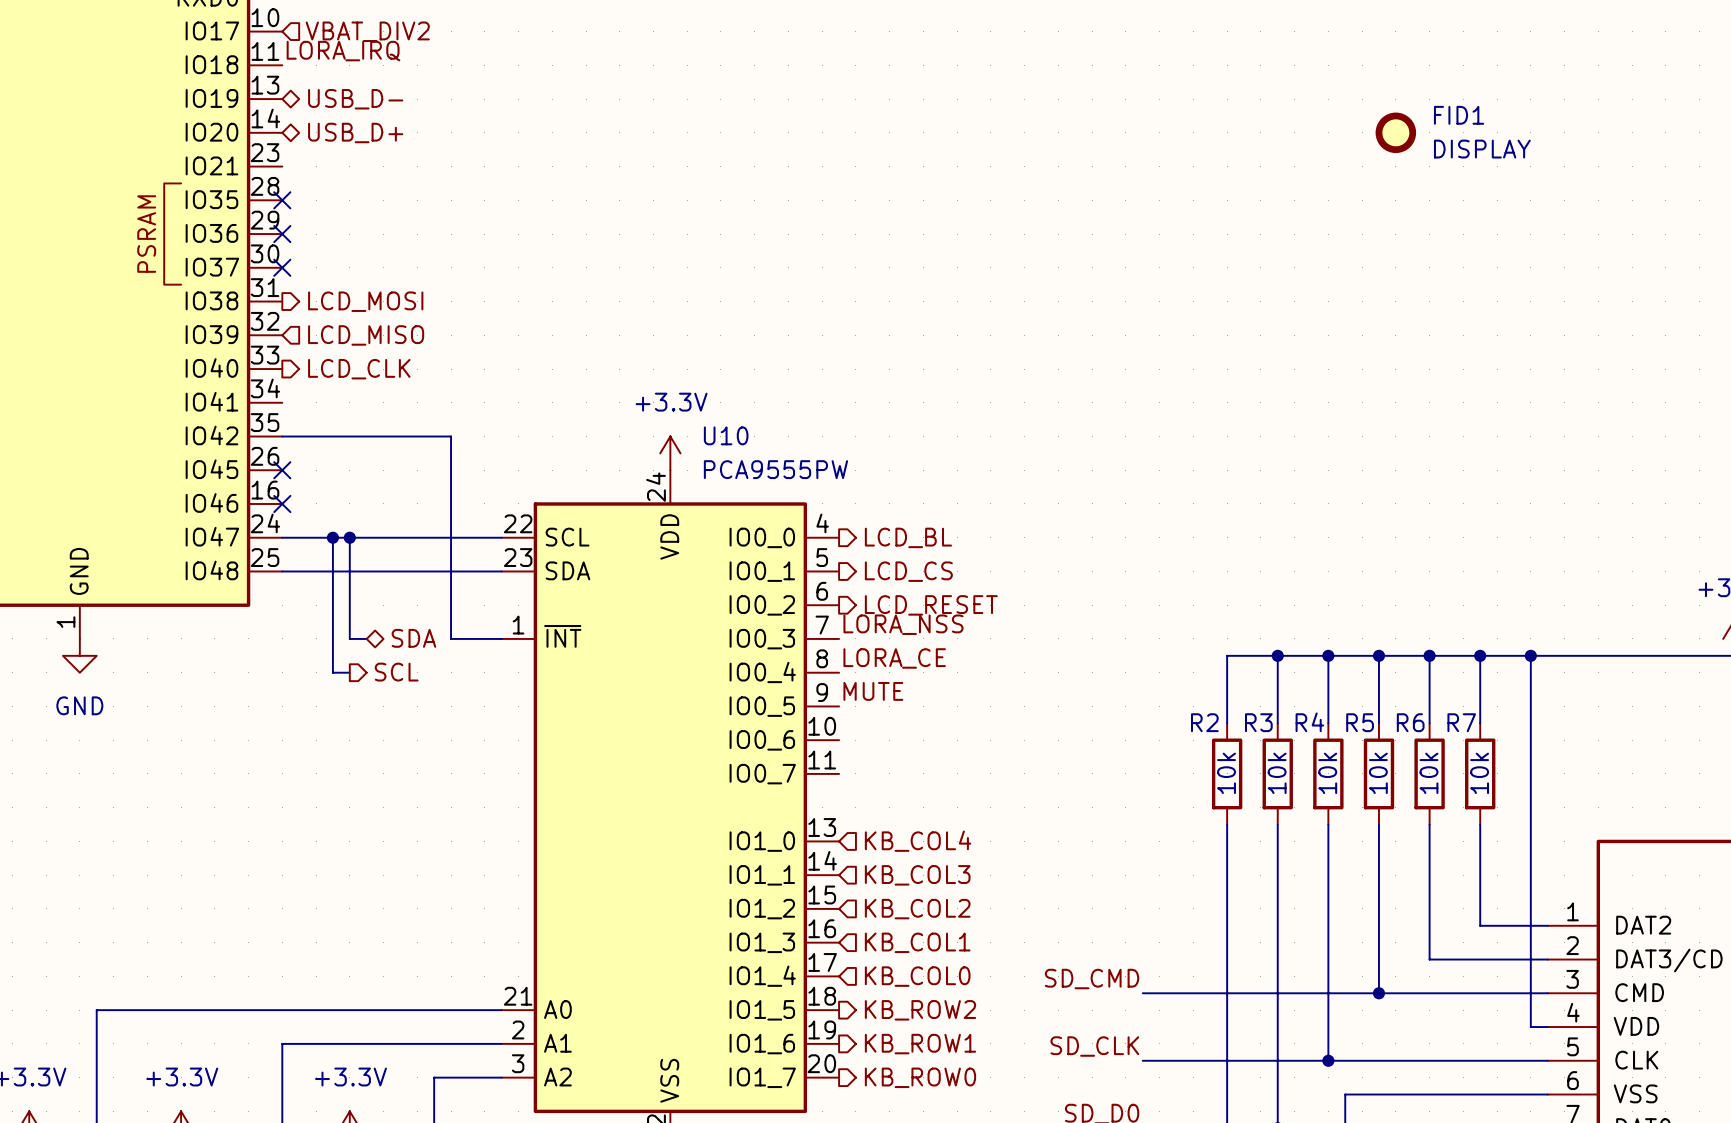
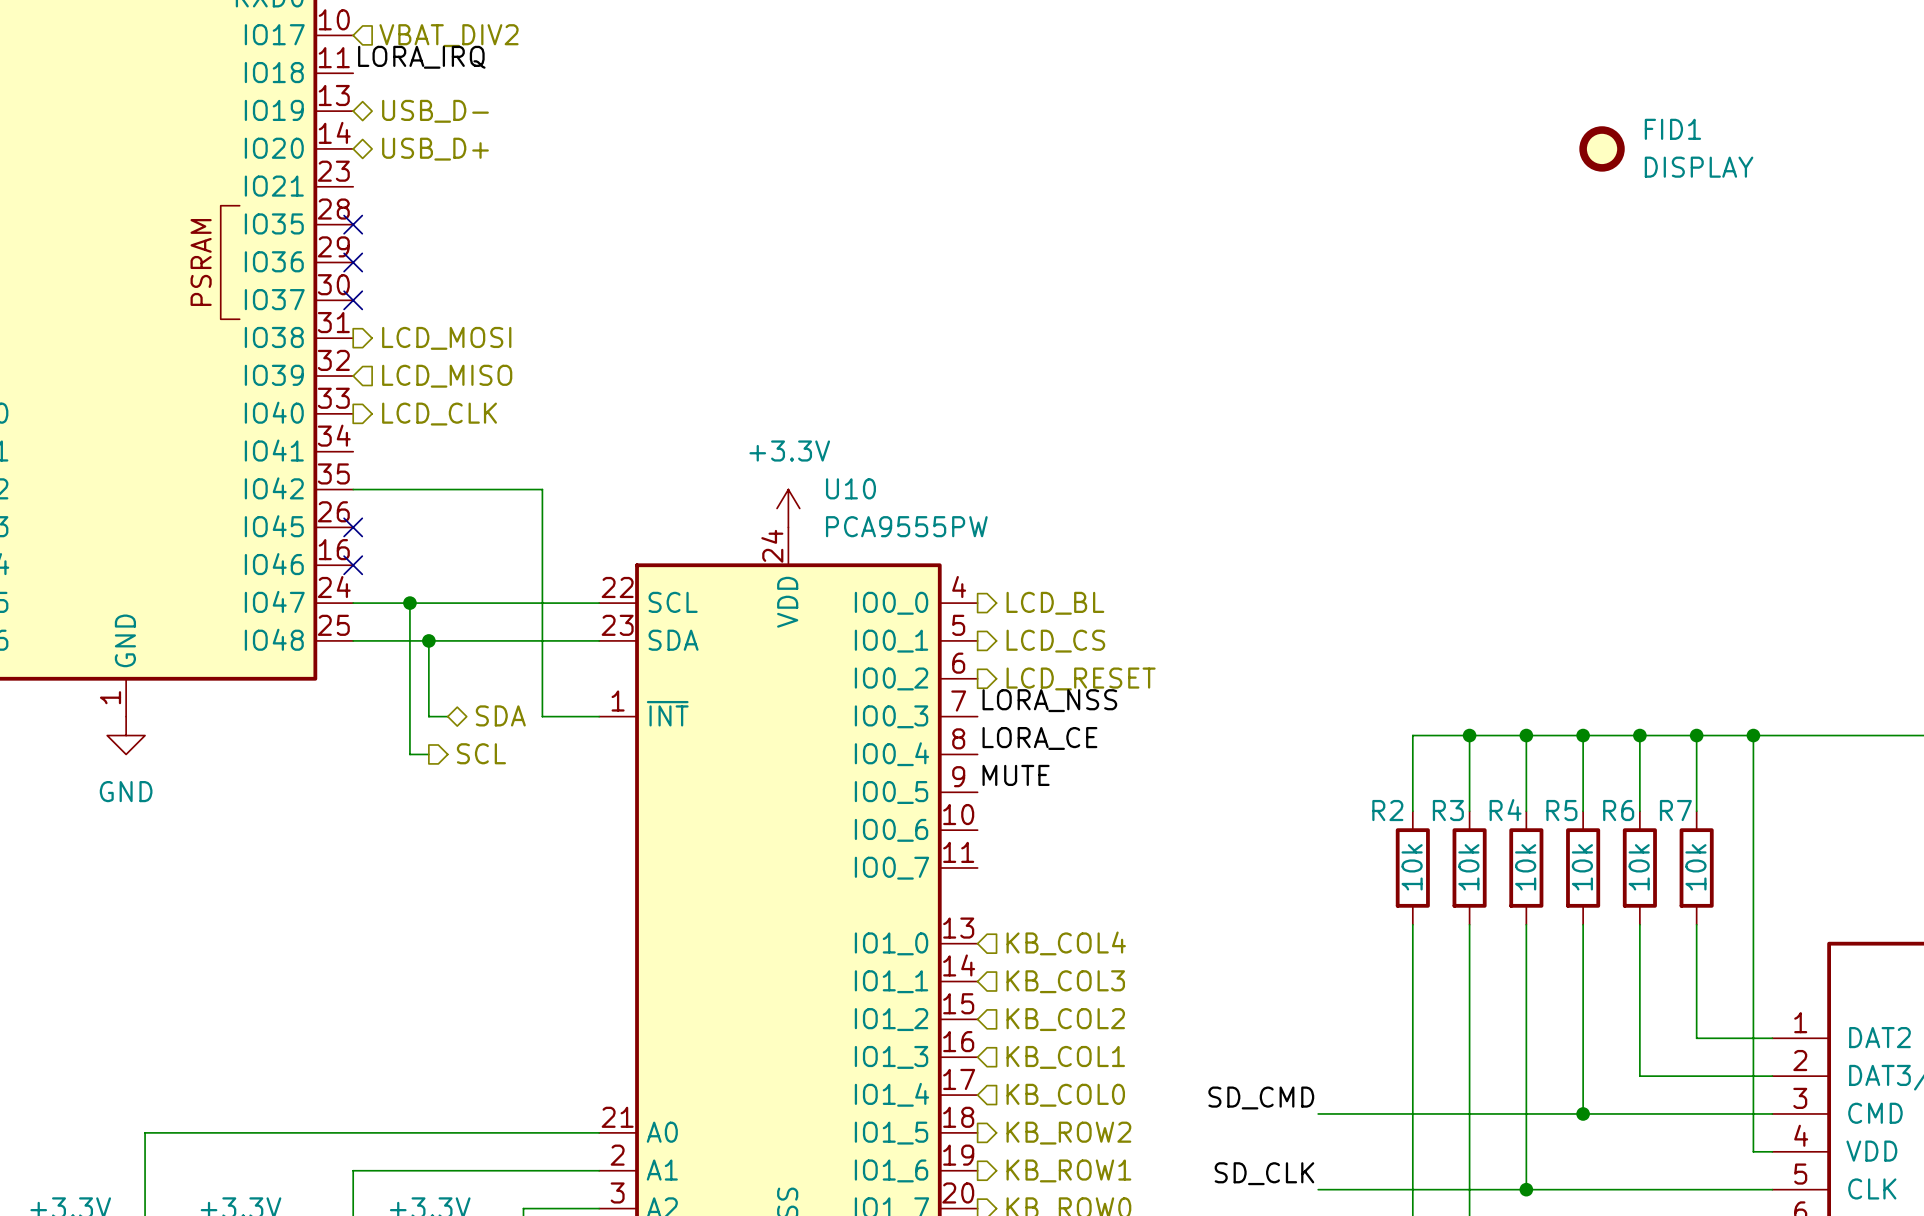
wire: (349, 537) (349, 571) -> none
junction position: (349, 537) -> (428, 640)

